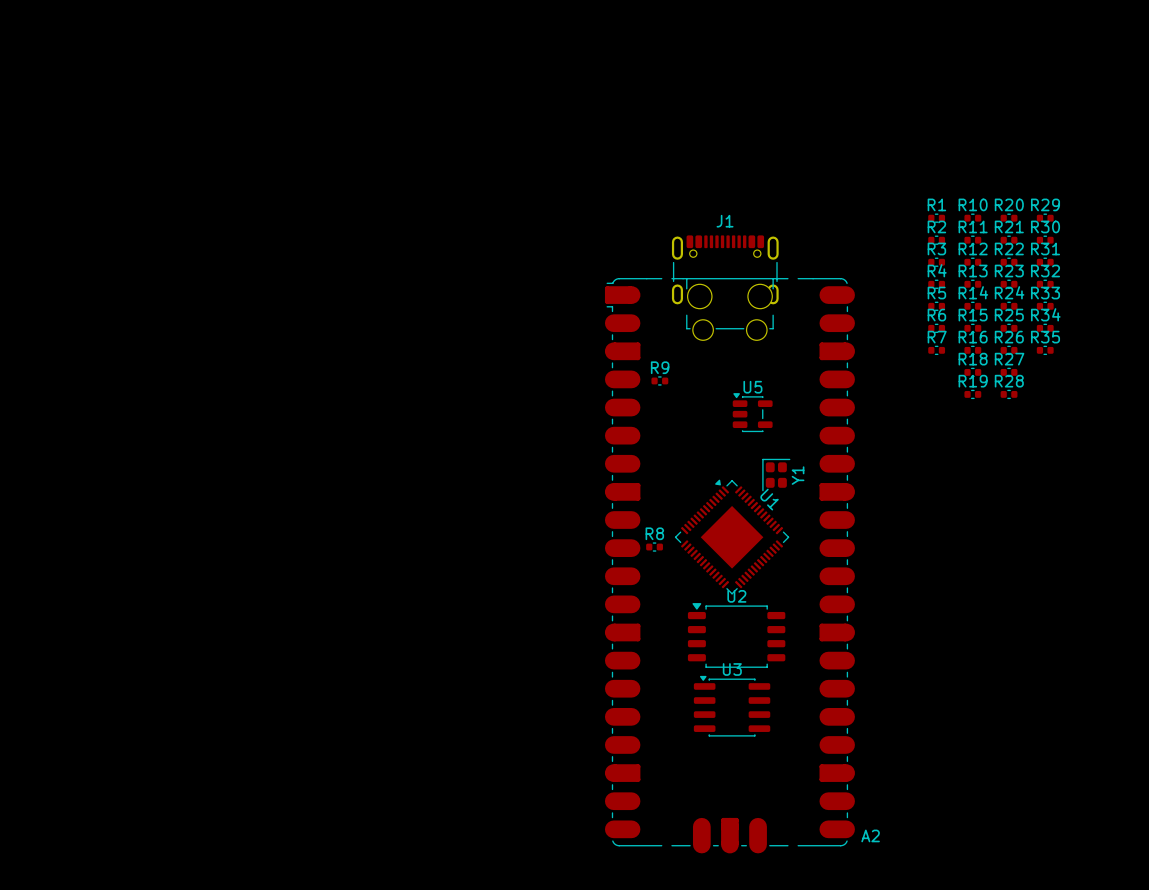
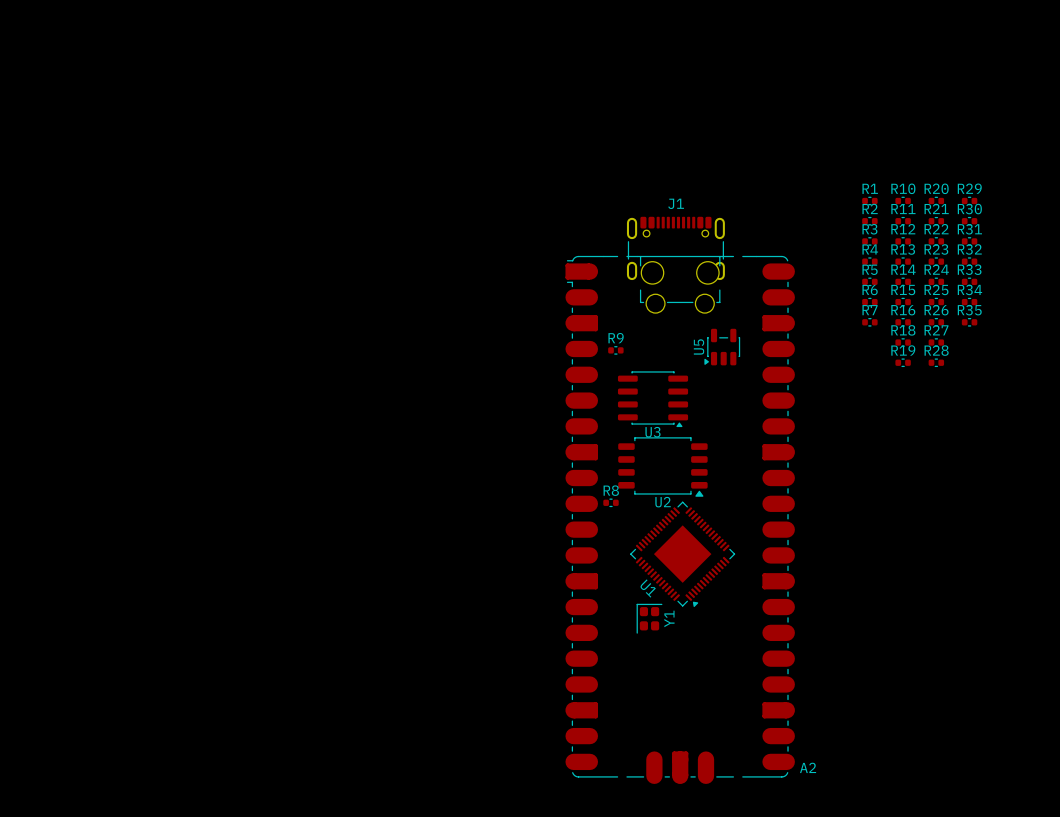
U5 rotation: 0° (752, 412) -> 90° counterclockwise (722, 347)
U5 position: (752, 412) -> (722, 347)
Y1 position: (776, 475) -> (649, 618)
U1 rotation: 0° (732, 537) -> 180° (682, 554)
U2 rotation: 0° (736, 635) -> 180° (662, 467)
U2 position: (736, 635) -> (662, 467)
U3 rotation: 0° (732, 706) -> 180° (653, 399)
U3 position: (732, 706) -> (653, 399)

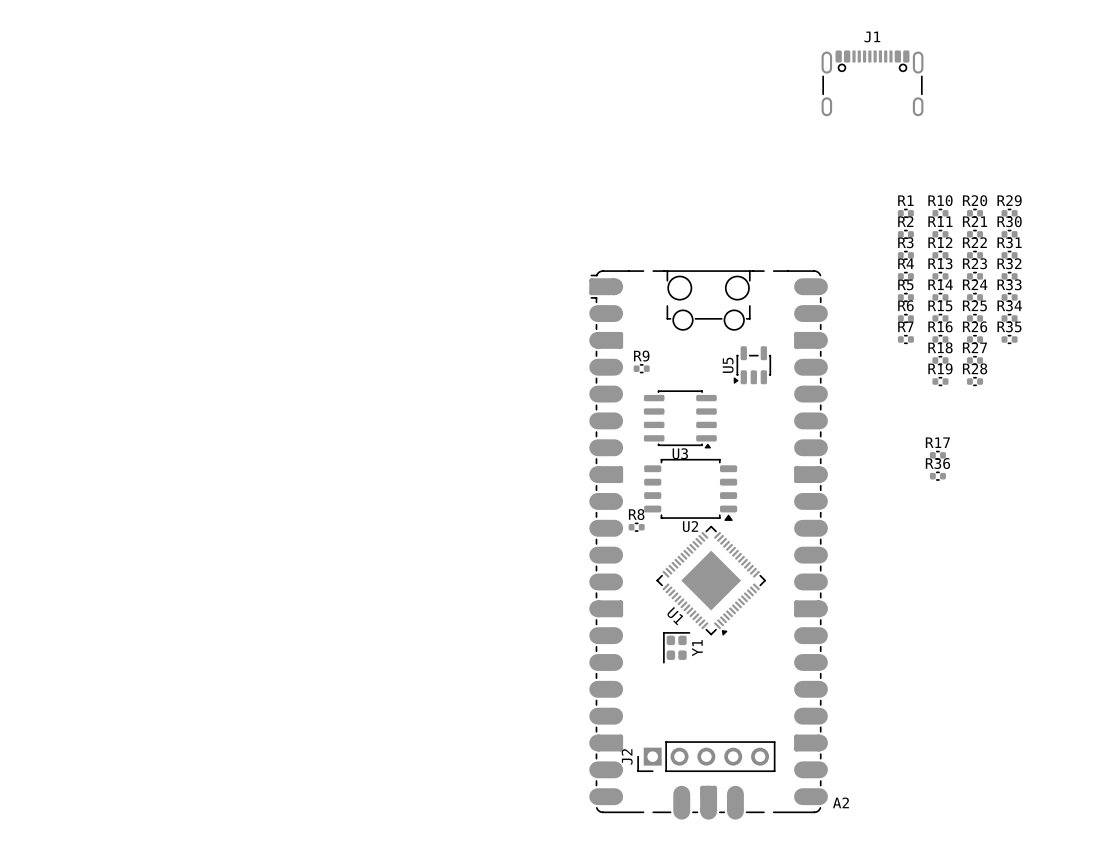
J1 position: (675, 248) -> (872, 83)
R17: none -> (937, 455)
R36: none -> (937, 476)
J2: none -> (706, 756)

